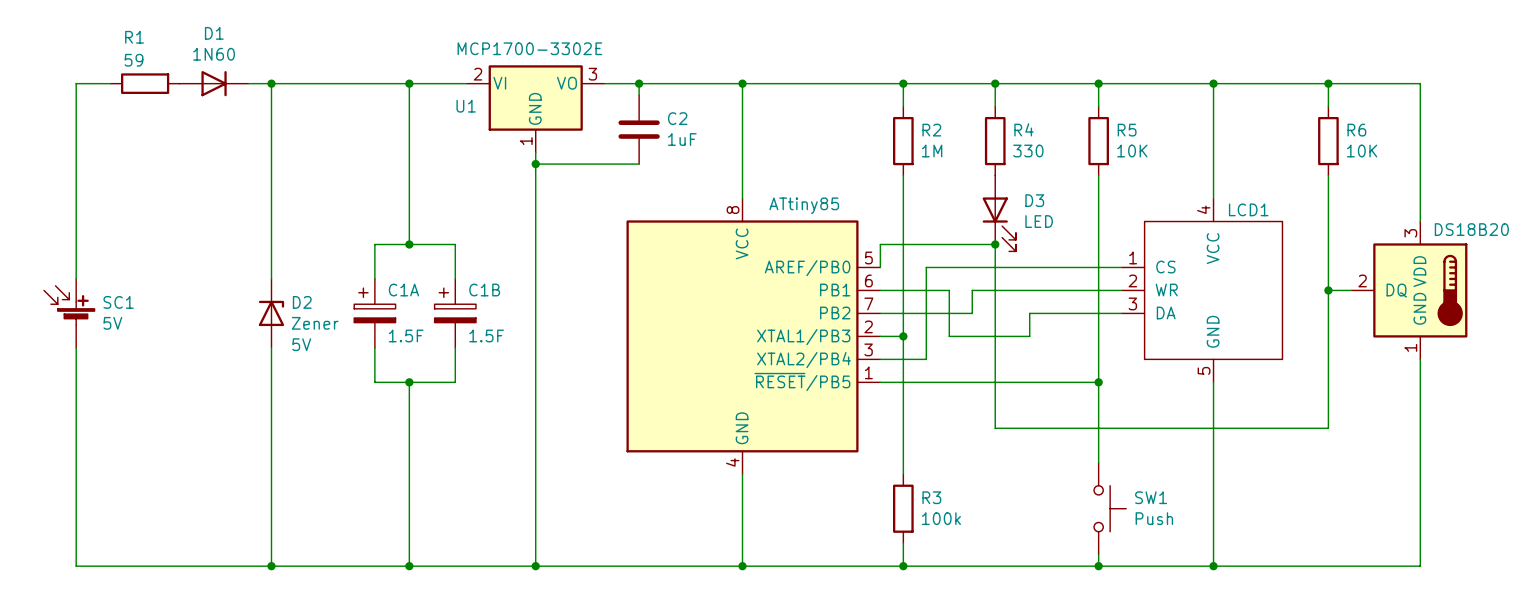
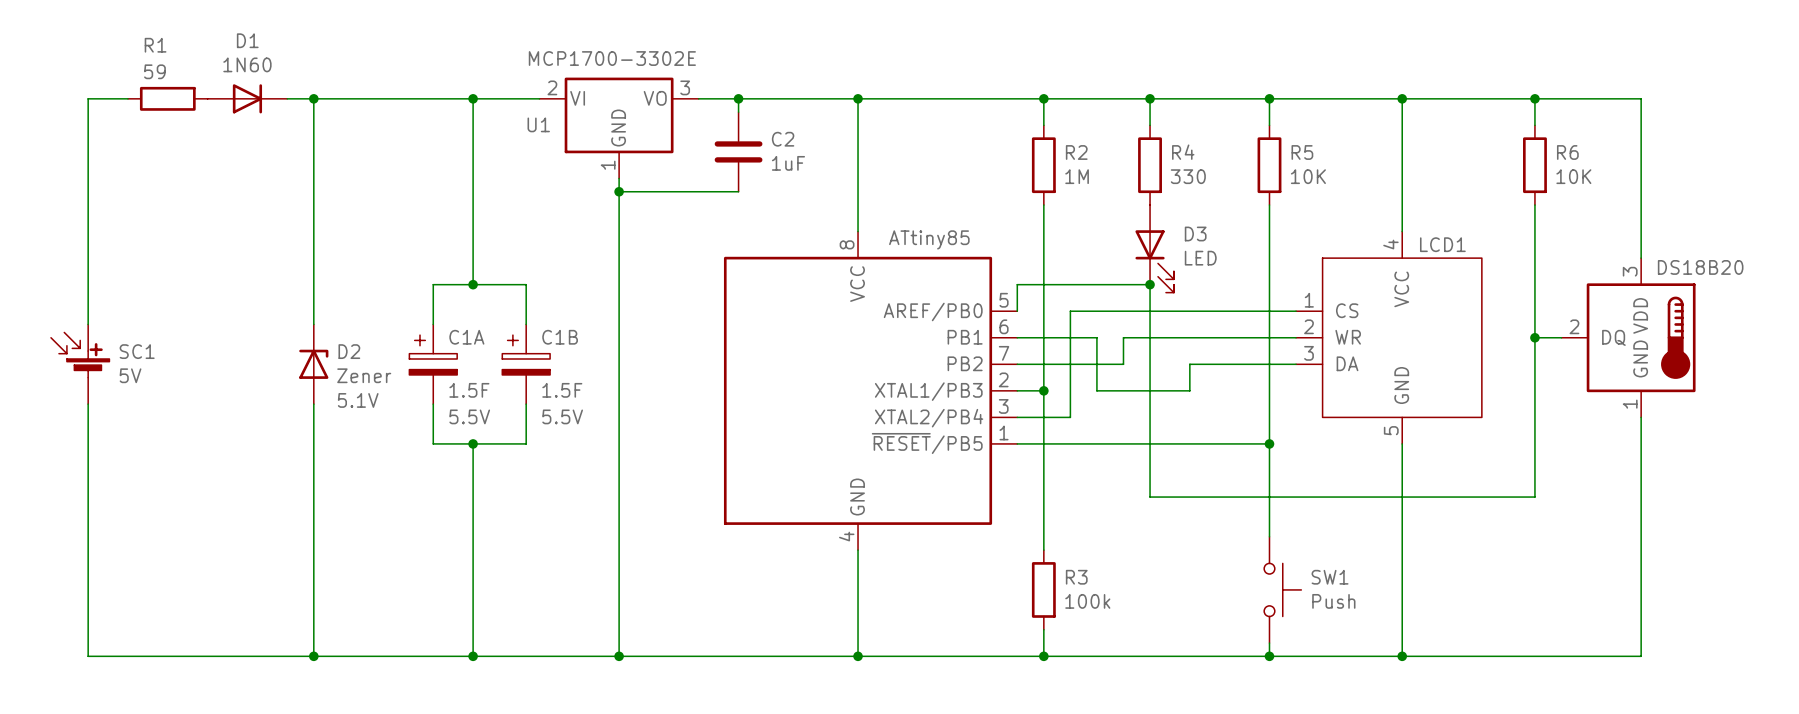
D2 text: 5V (301, 344) -> 5.1V (358, 400)
C1A text: none -> 5.5V (469, 416)
C1B text: none -> 5.5V (562, 416)

